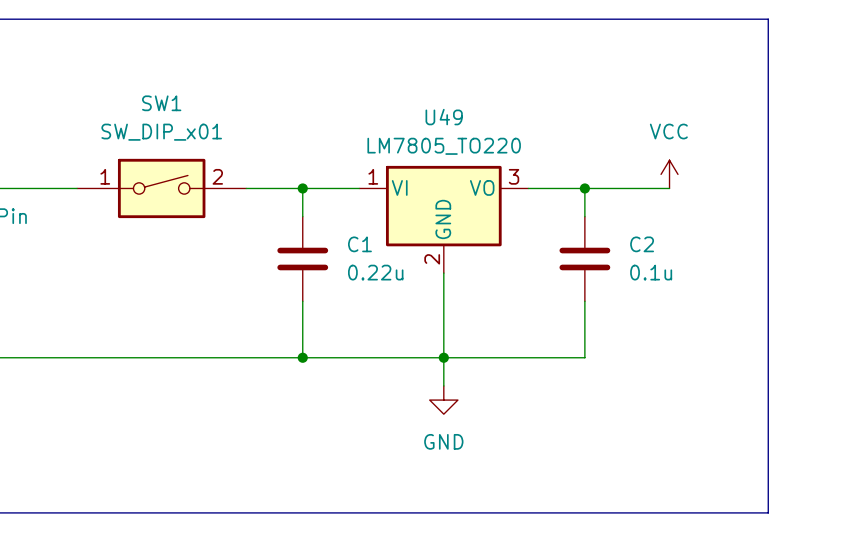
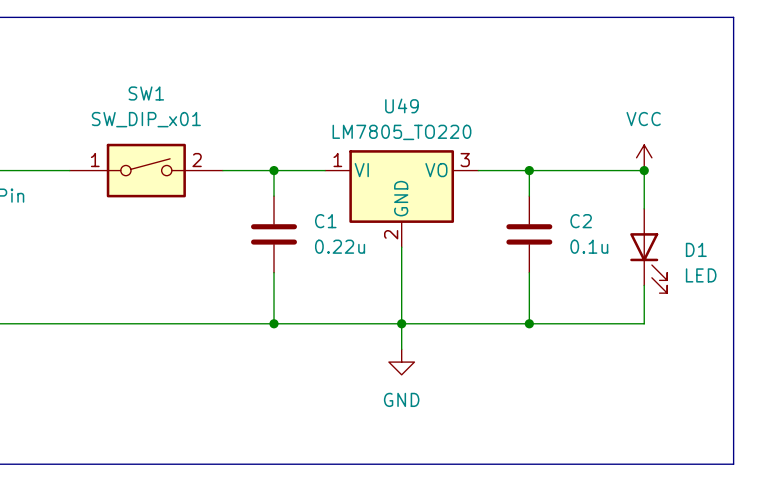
line: (768, 19) (768, 512) -> (695, 17) (733, 17) (733, 464) (695, 464)
power symbol position: VCC (669, 174) -> VCC (644, 157)
wire: none -> (605, 170) (644, 170) (644, 208)
junction: none -> (644, 170)
D1: none -> LED (648, 251)
wire: none -> (644, 285) (644, 323) (529, 323)
junction: none -> (529, 323)

